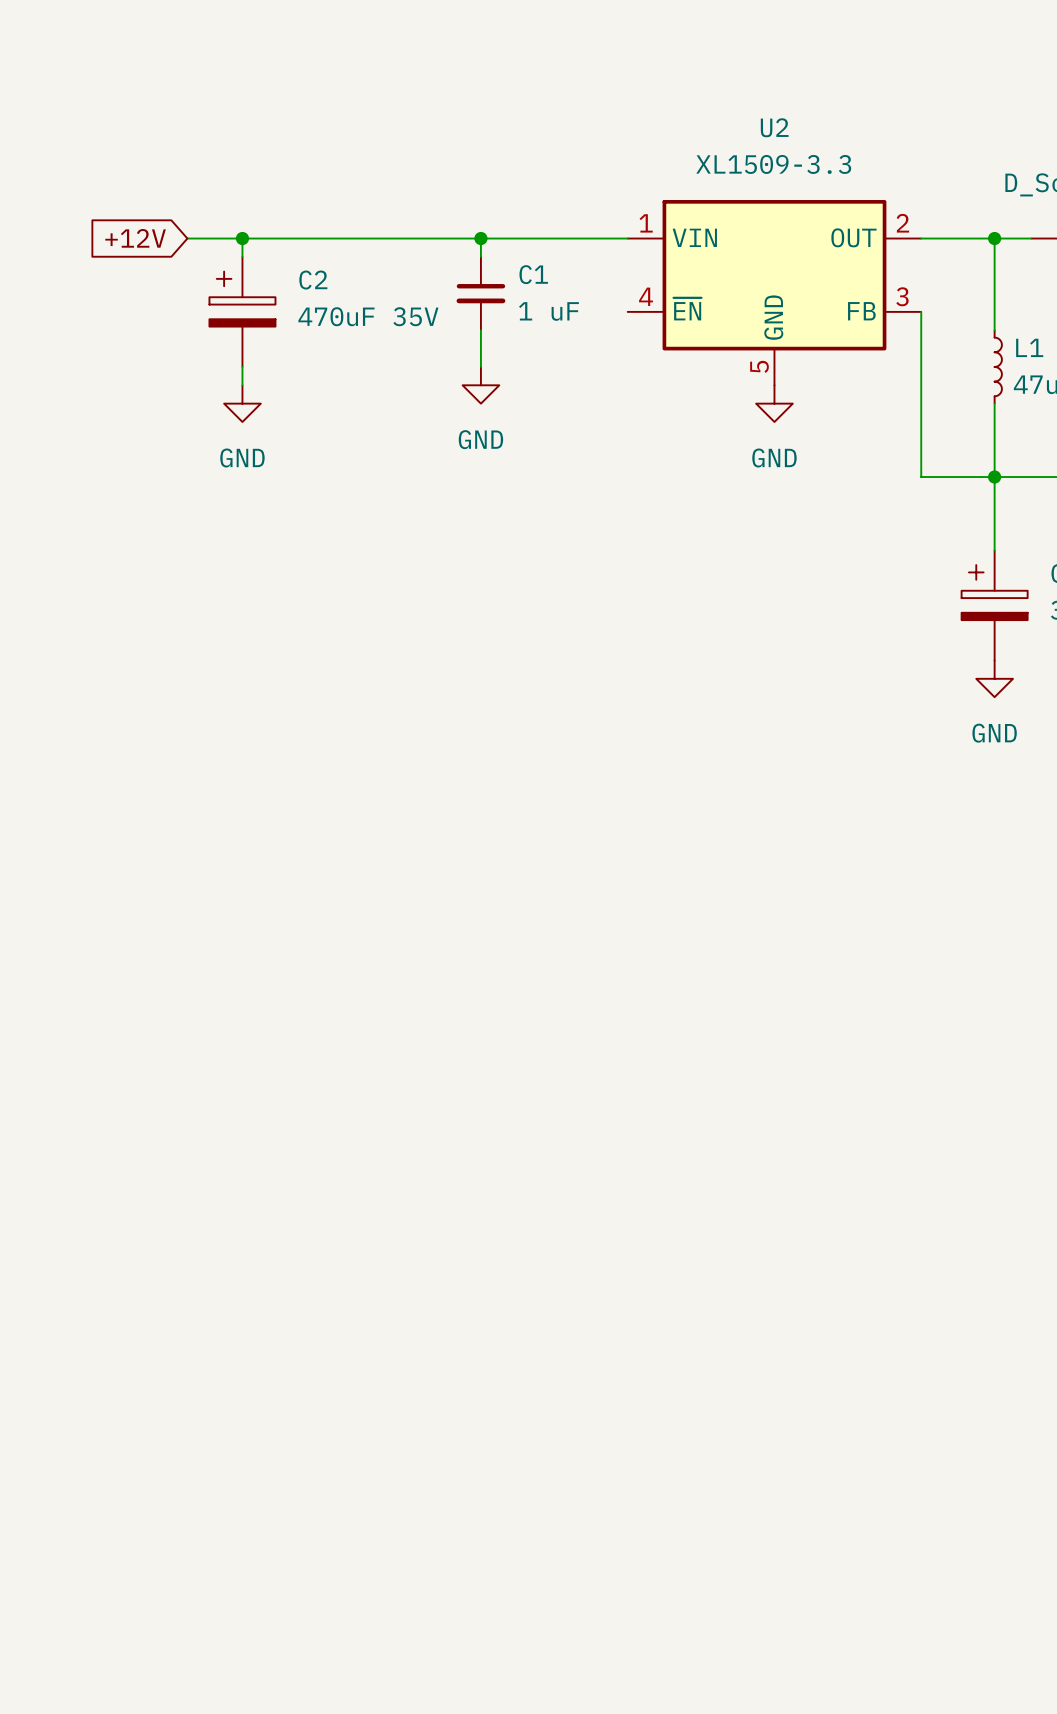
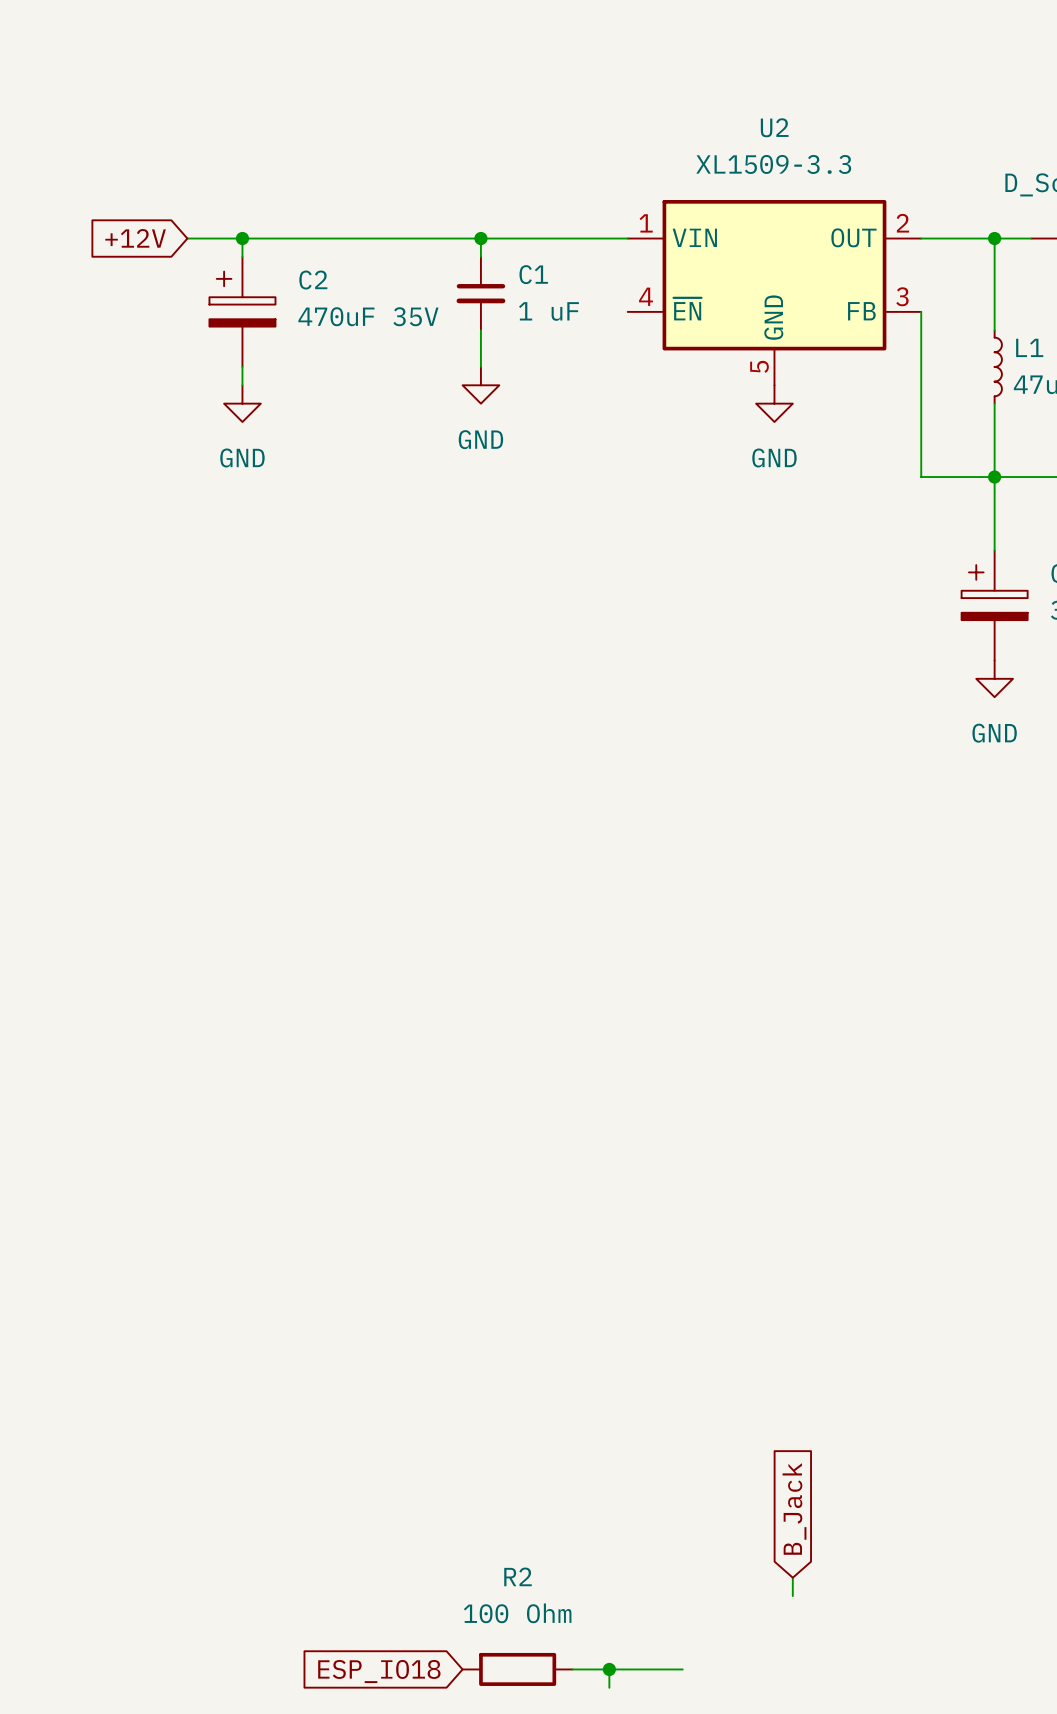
global label: none -> B_Jack (794, 1508)
wire: none -> (792, 1577) (792, 1596)
R2: none -> 100 Ohm (517, 1669)
wire: none -> (572, 1669) (682, 1669)
wire: none -> (609, 1669) (609, 1687)
junction: none -> (609, 1669)
global label: none -> ESP_IO18 (379, 1671)

